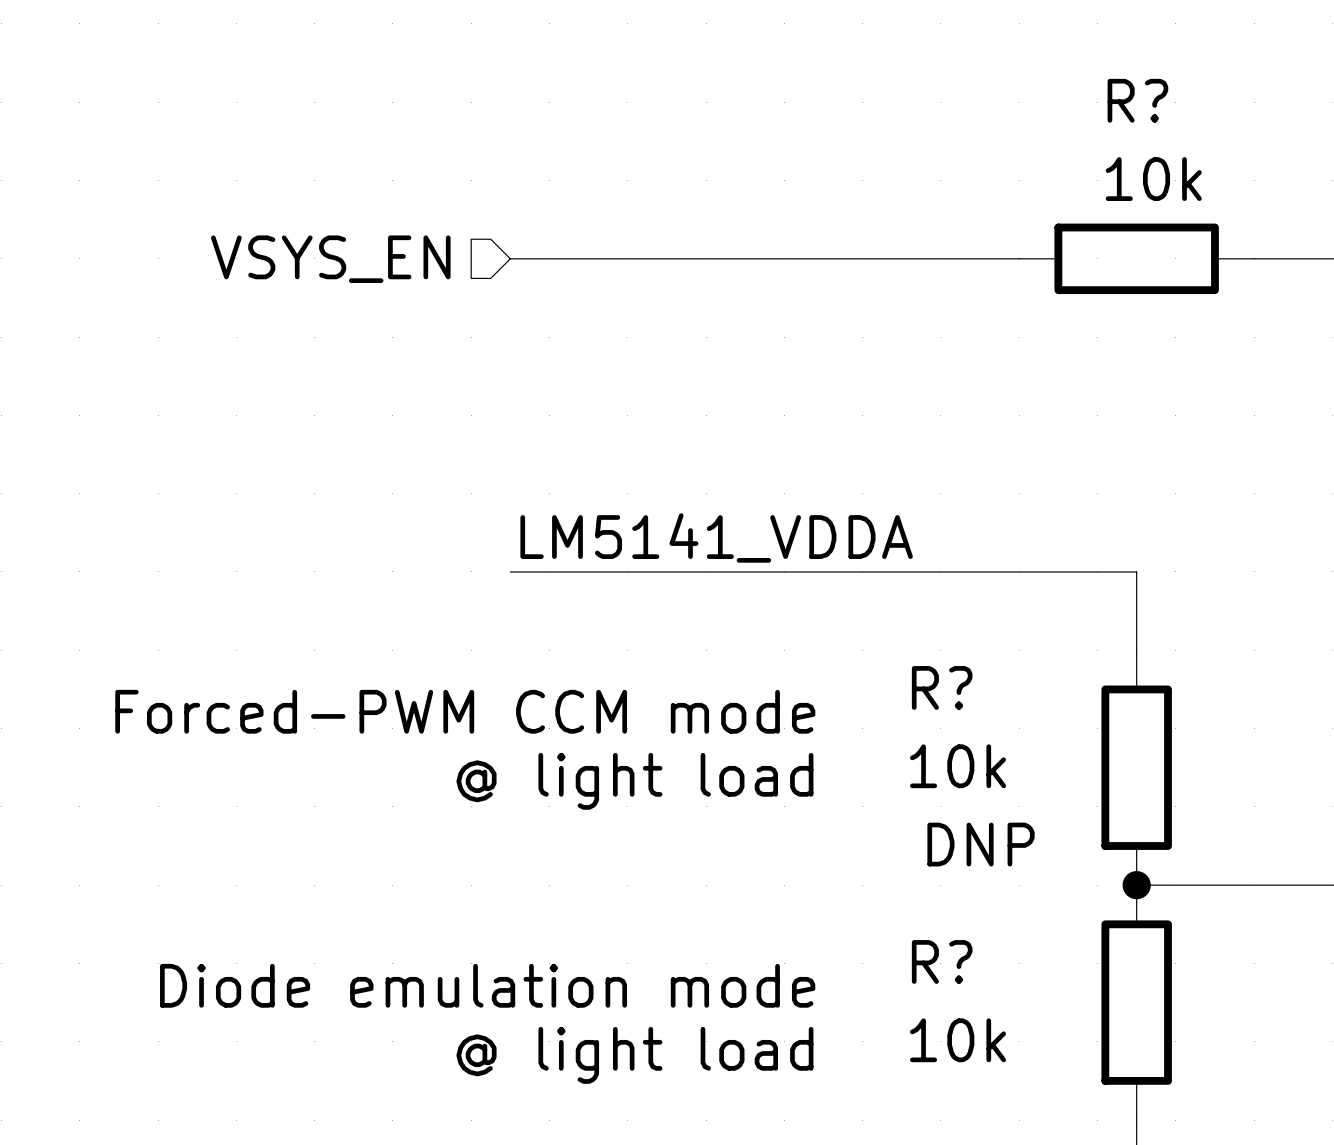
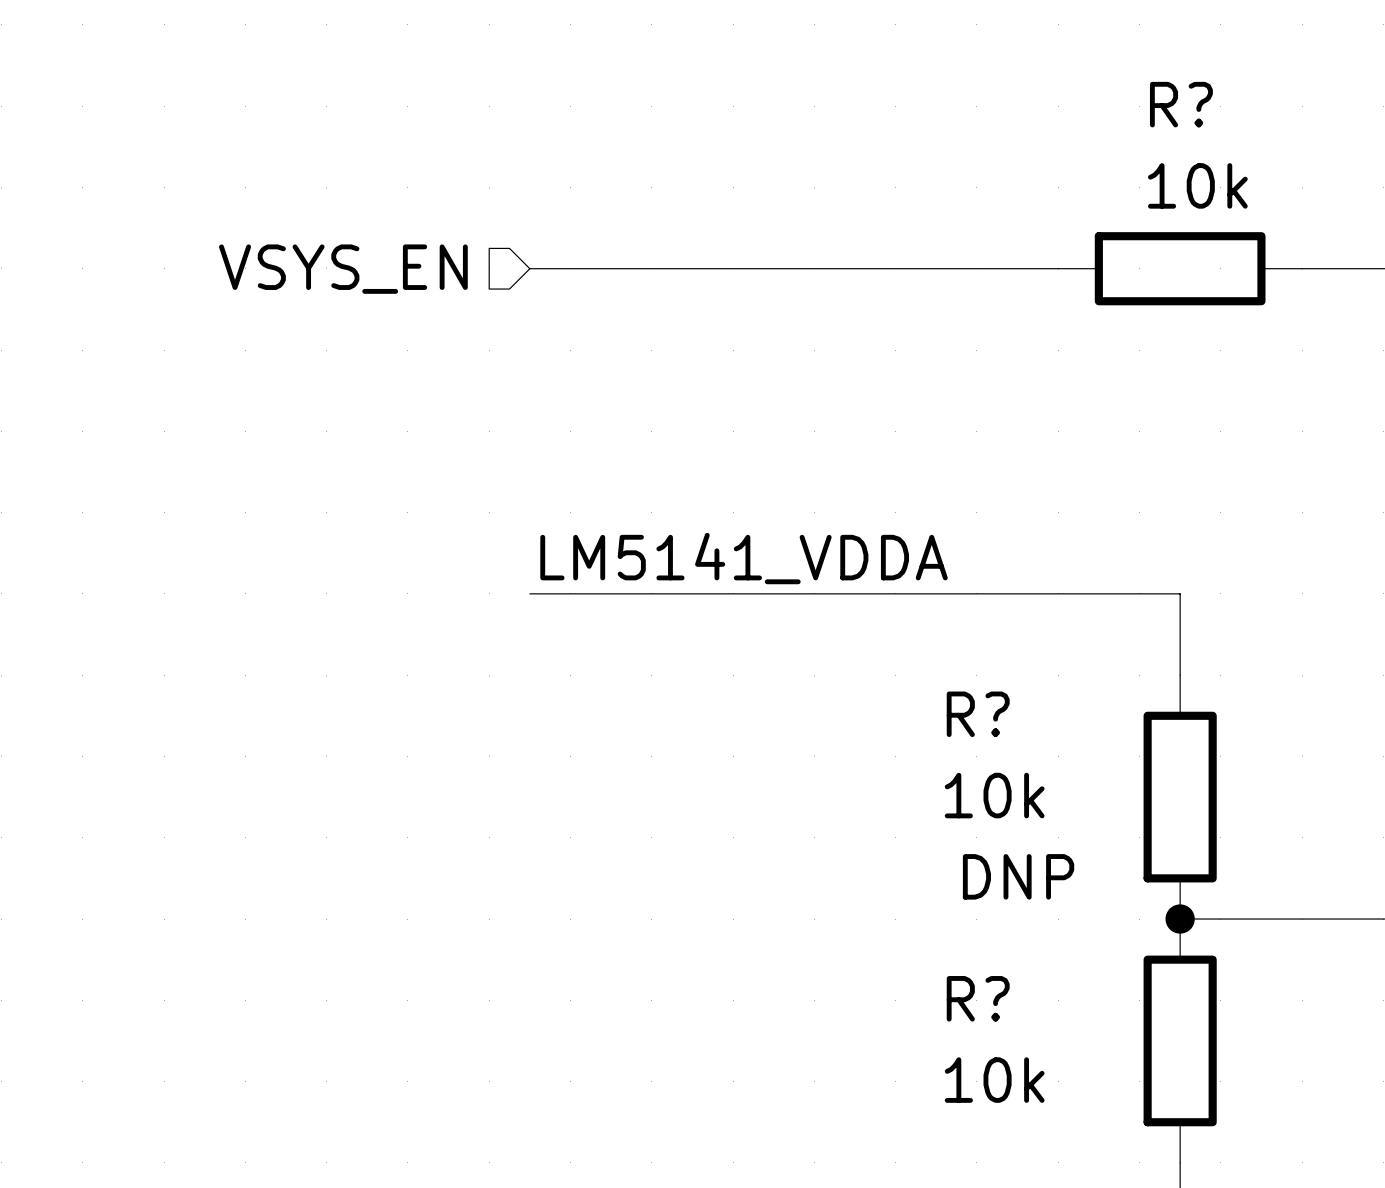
text: Forced-PWM CCM mode (465, 711) -> none
text: @ light load (634, 781) -> none
text: Diode emulation mode (487, 985) -> none
text: @ light load (634, 1055) -> none

